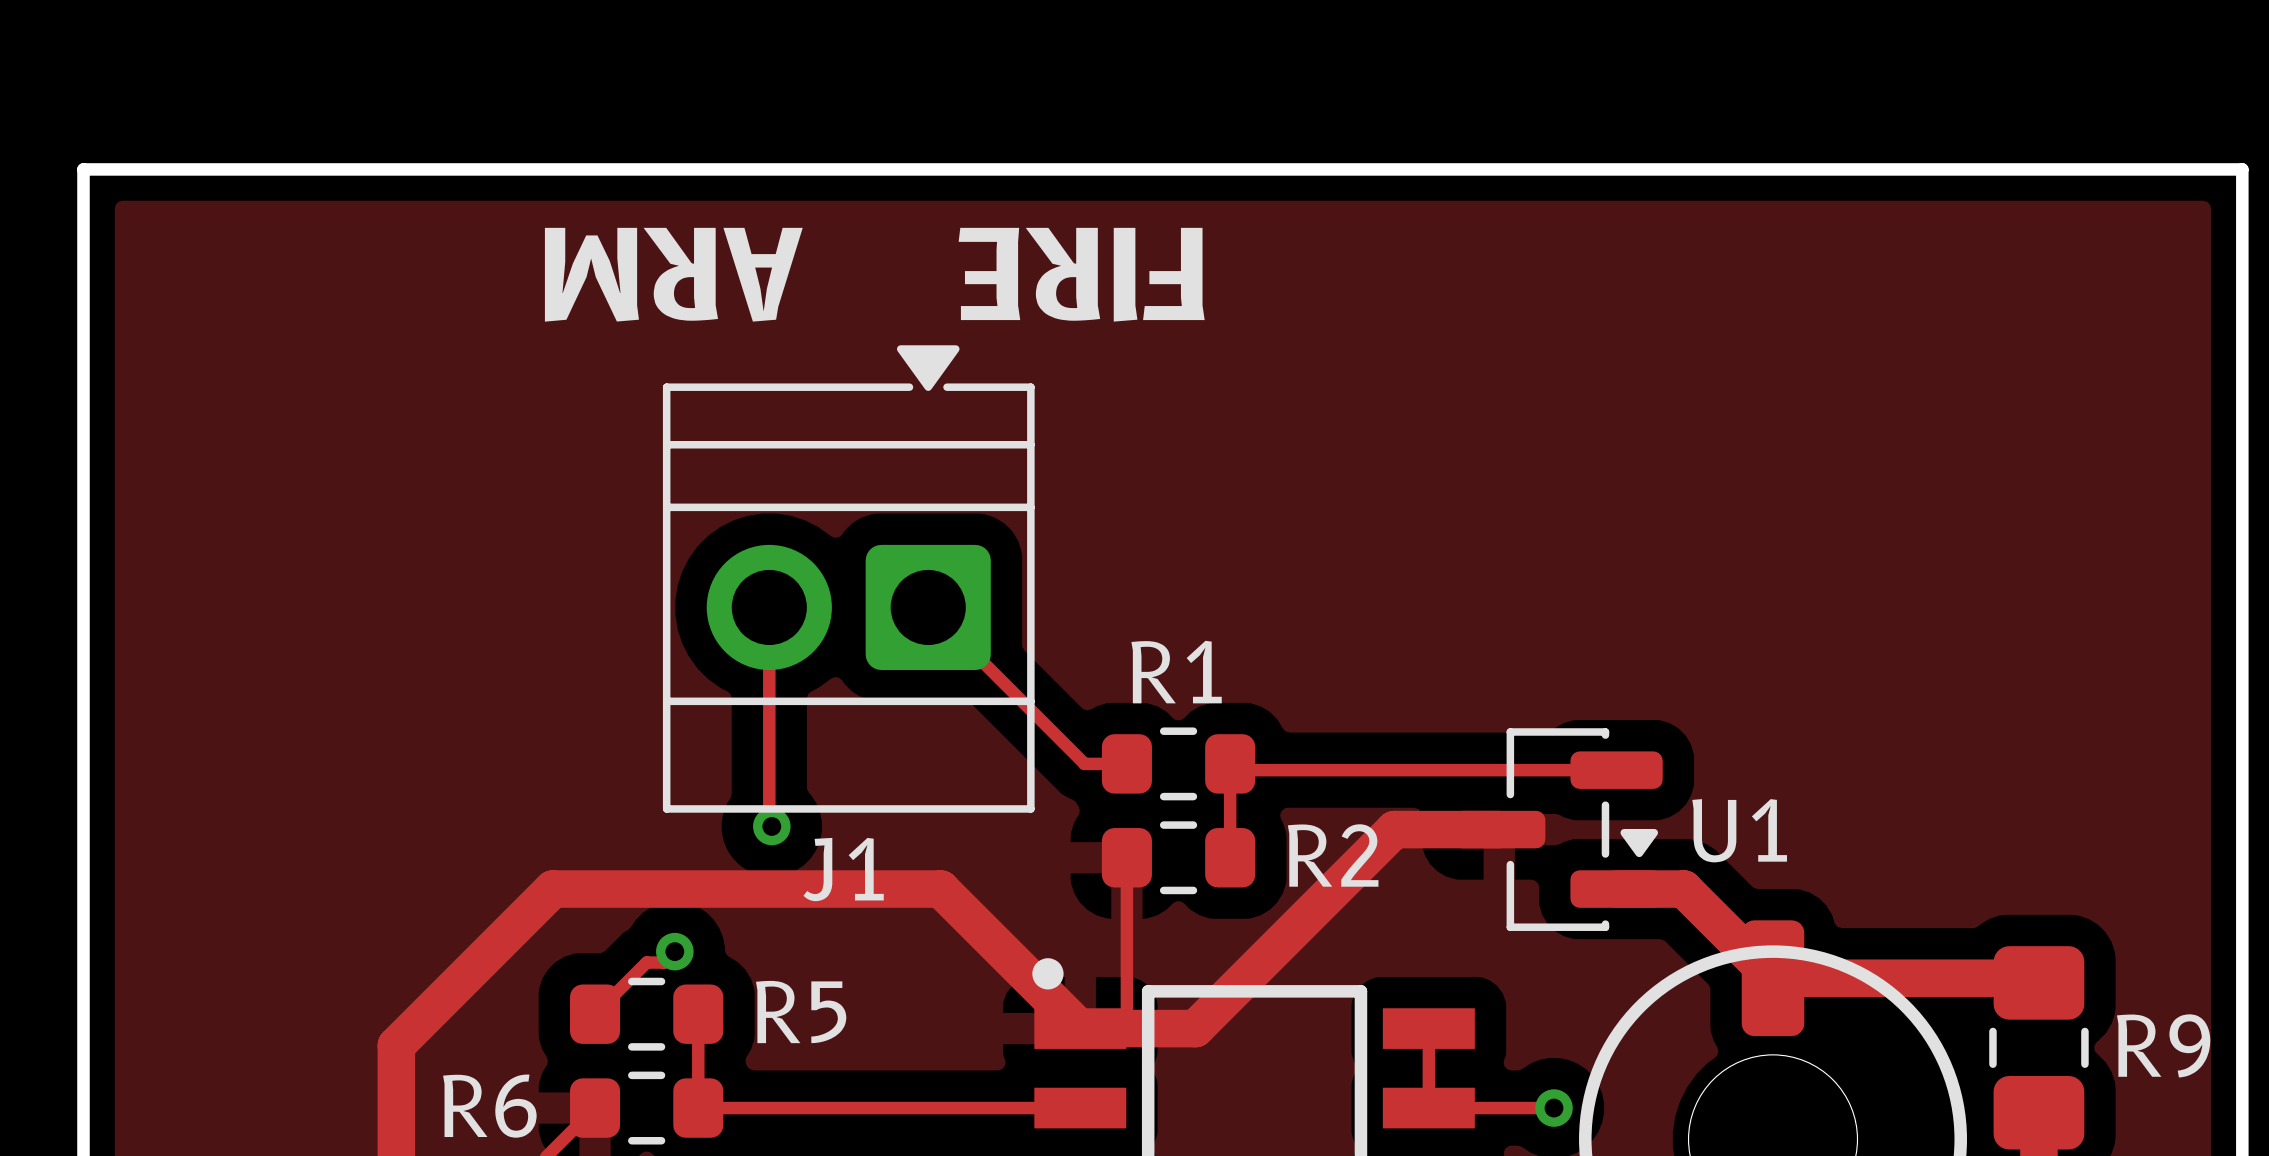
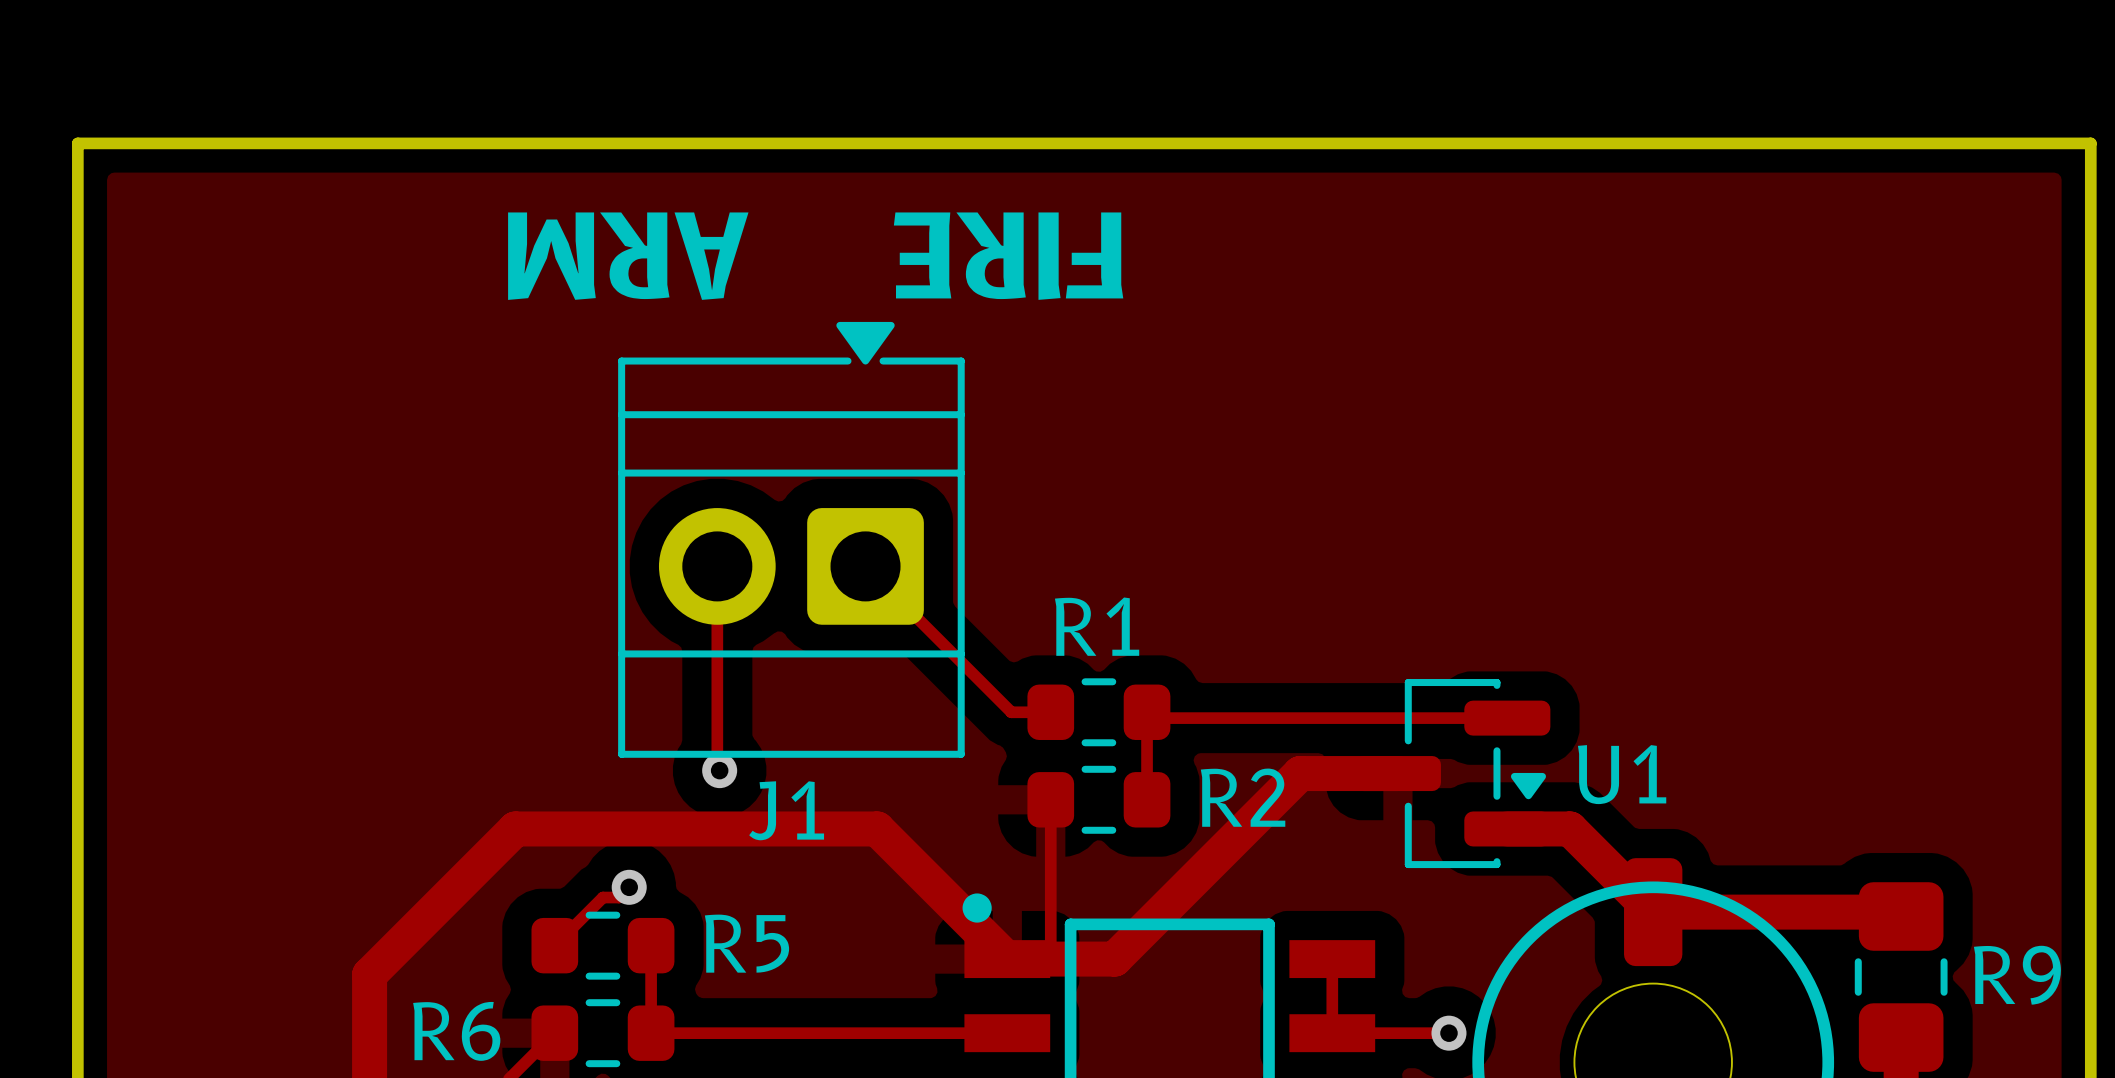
board edge: (83, 169) (2242, 169) -> (77, 157) (77, 143) (2090, 143) (2090, 157)

